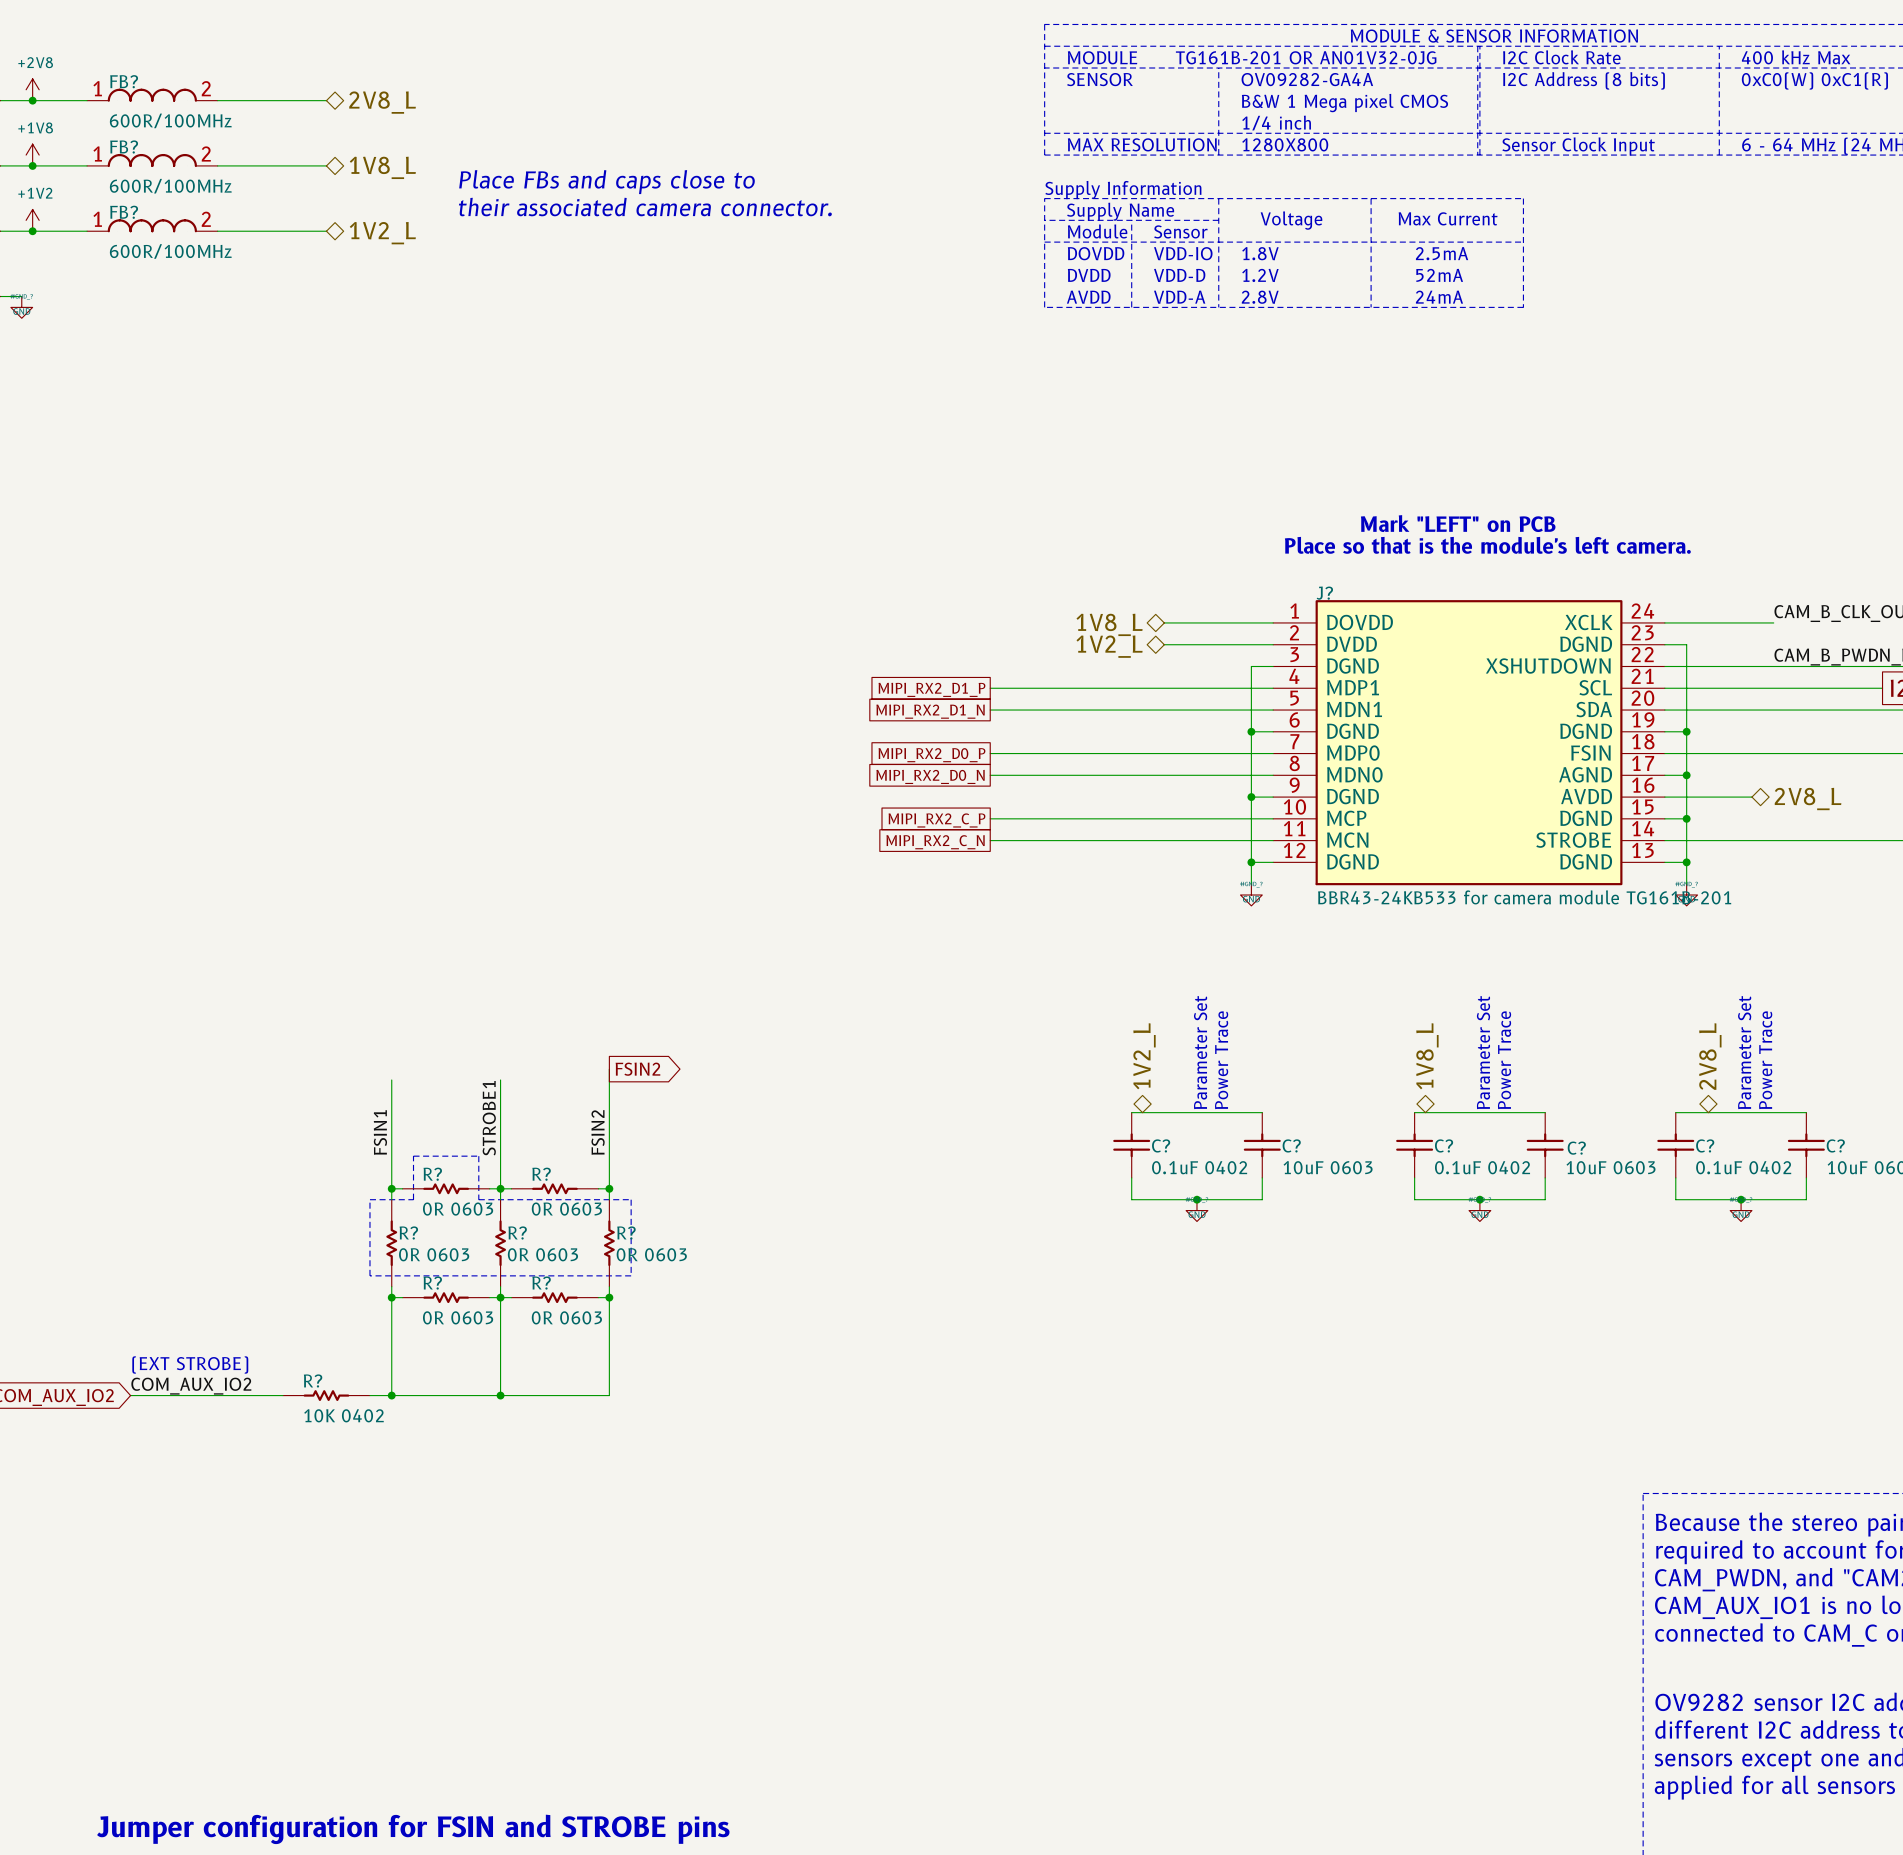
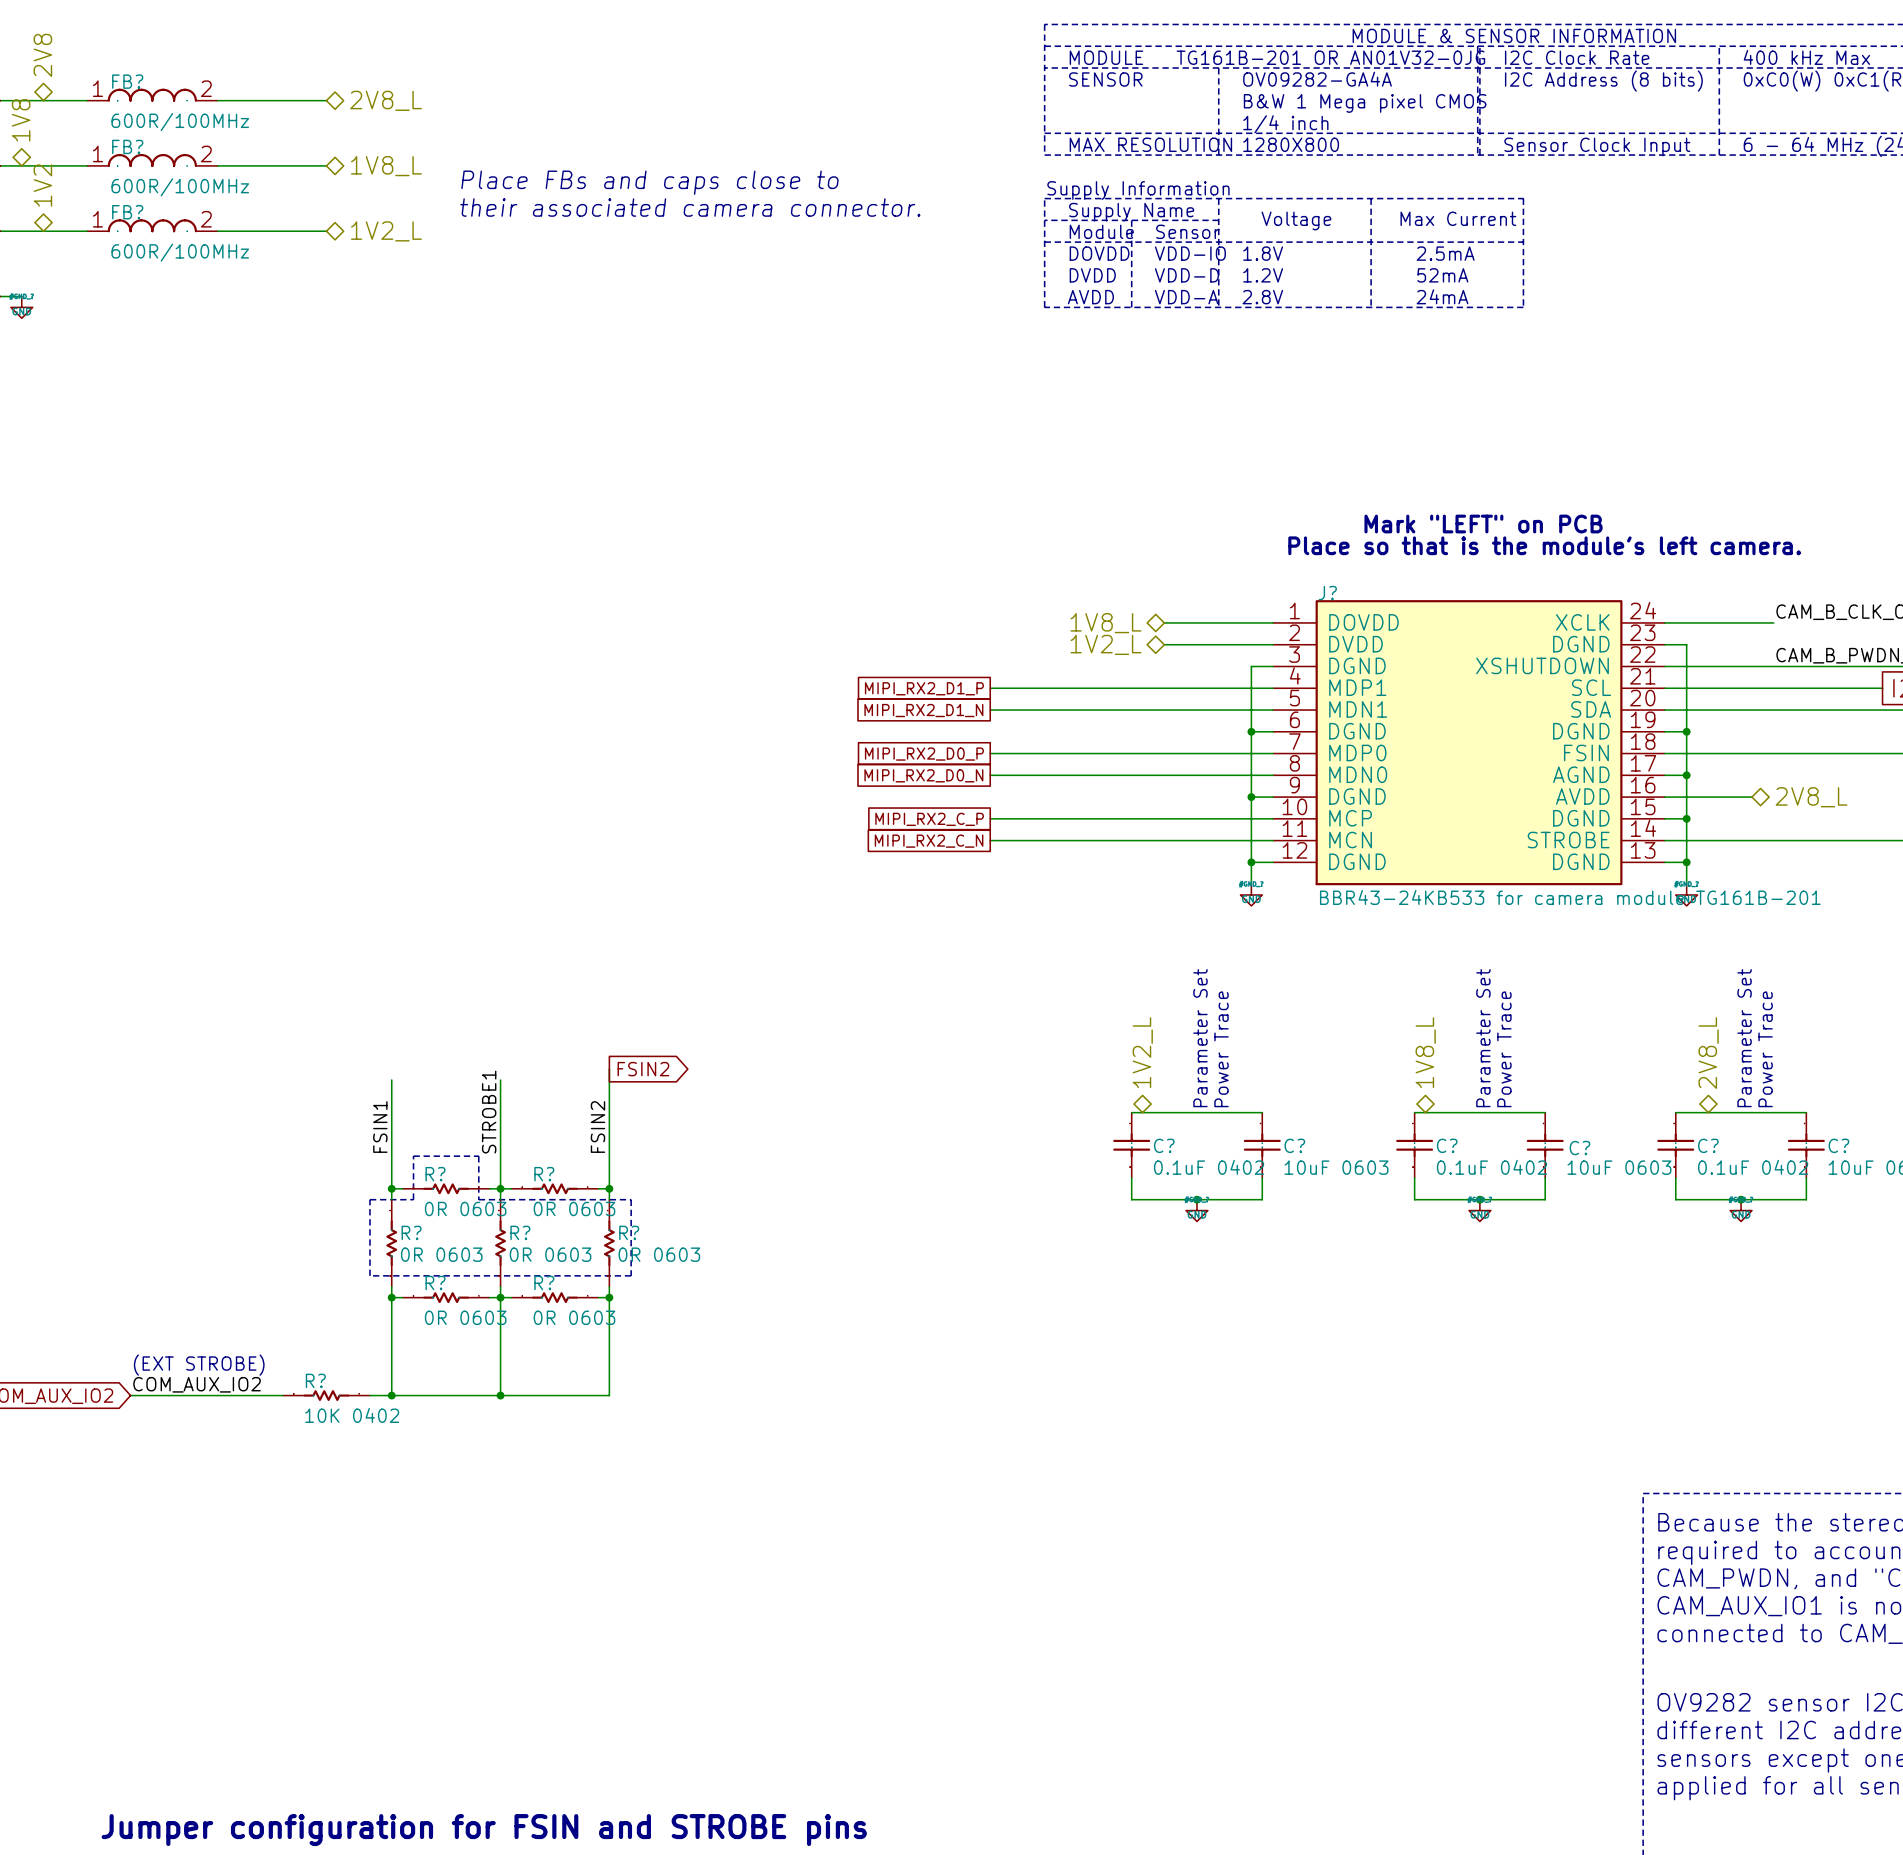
hierarchical label: none -> 2V8 (42, 55)
power symbol: +2V8 (32, 89) -> none
junction: (32, 100) -> none
hierarchical label: none -> 1V8 (21, 120)
power symbol: +1V8 (32, 155) -> none
junction: (32, 165) -> none
hierarchical label: none -> 1V2 (42, 185)
power symbol: +1V2 (32, 220) -> none
junction: (32, 231) -> none

